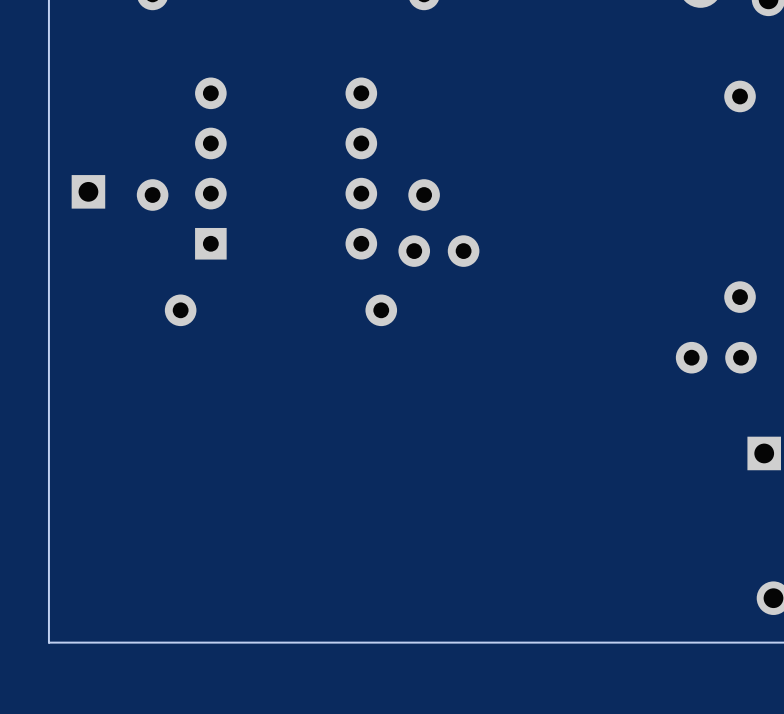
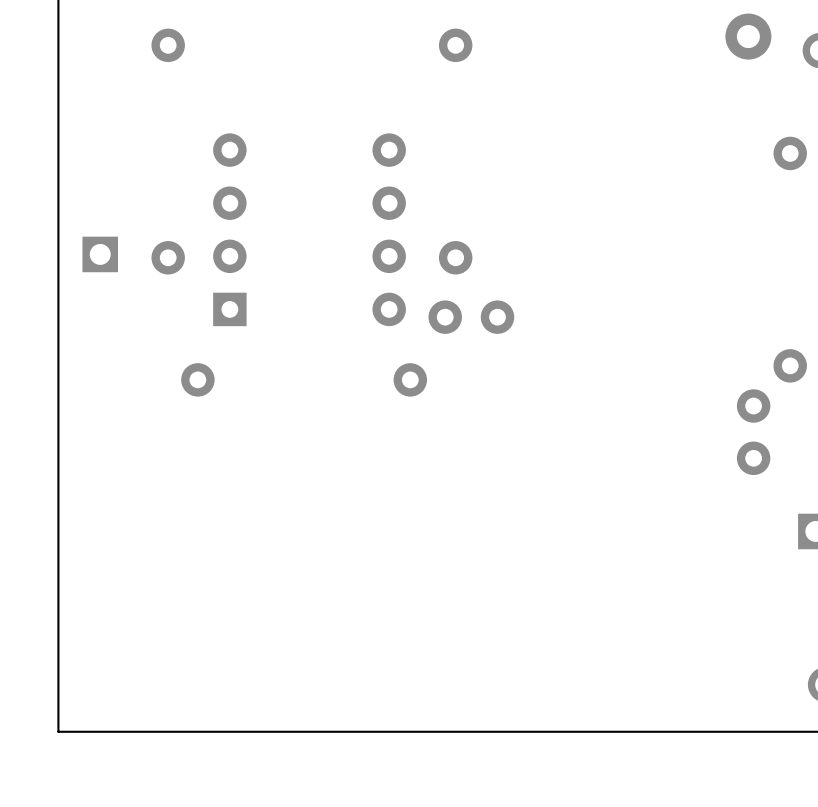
part rotation: 0° (716, 357) -> 90° clockwise (753, 432)

